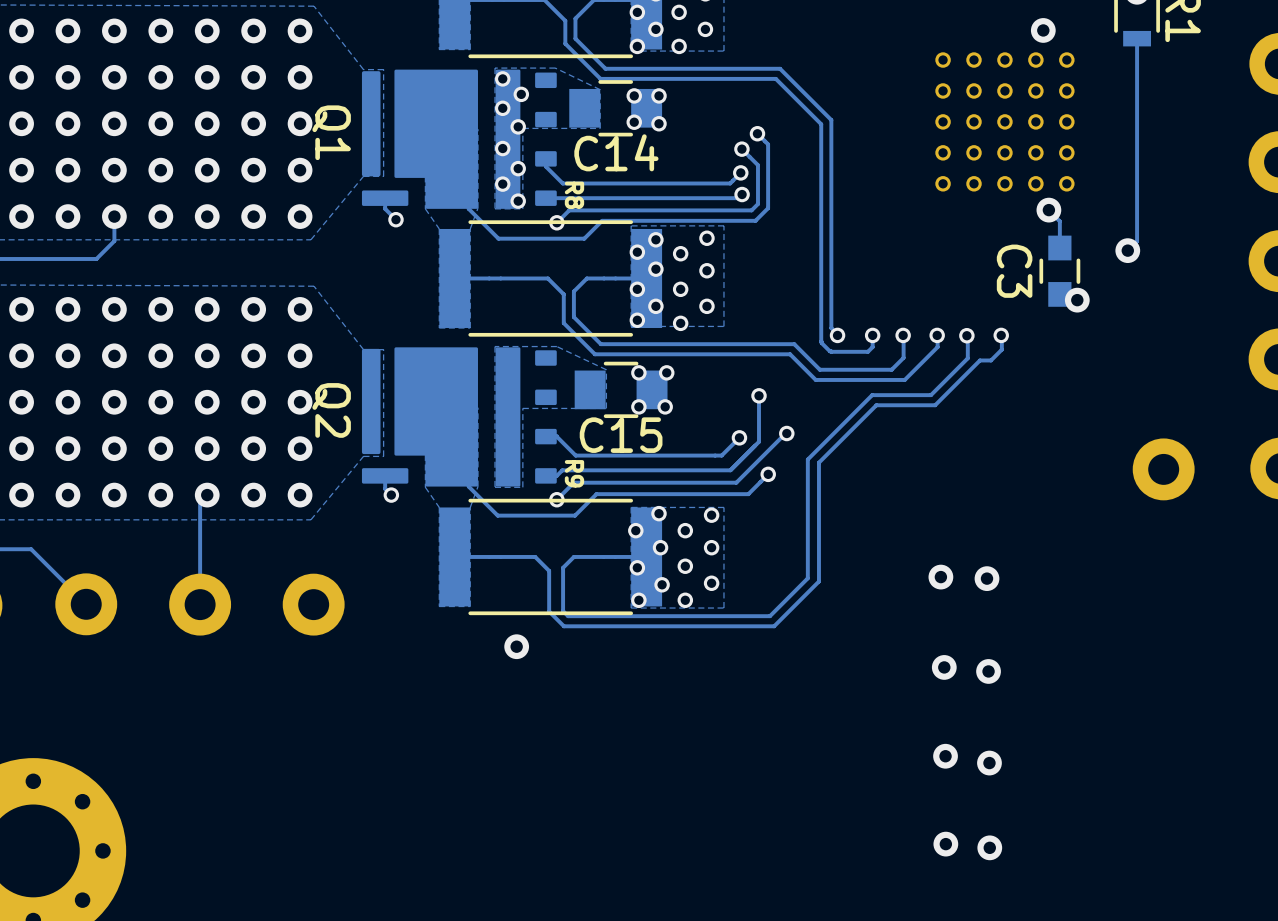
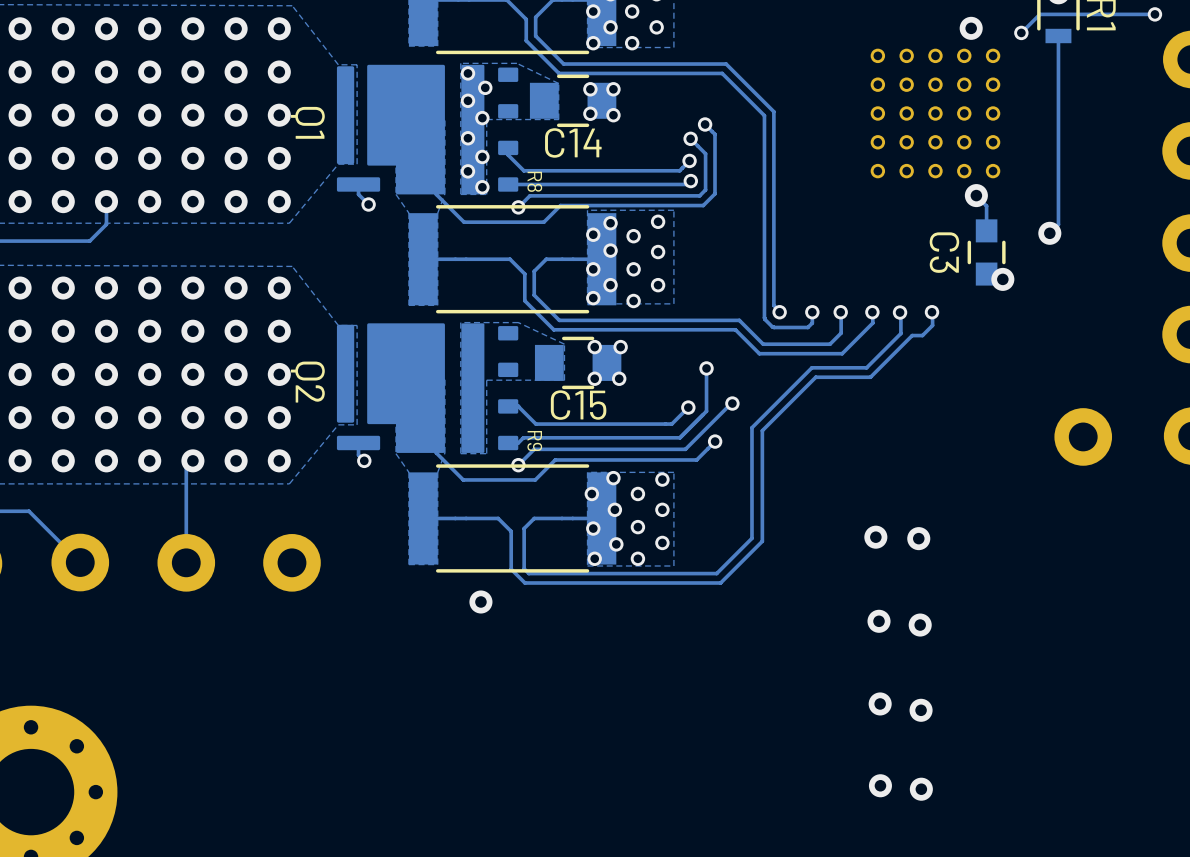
track: none -> (1154, 14) (1039, 14) (1021, 32)
via: none -> (1154, 14)
via: none -> (1021, 32)

